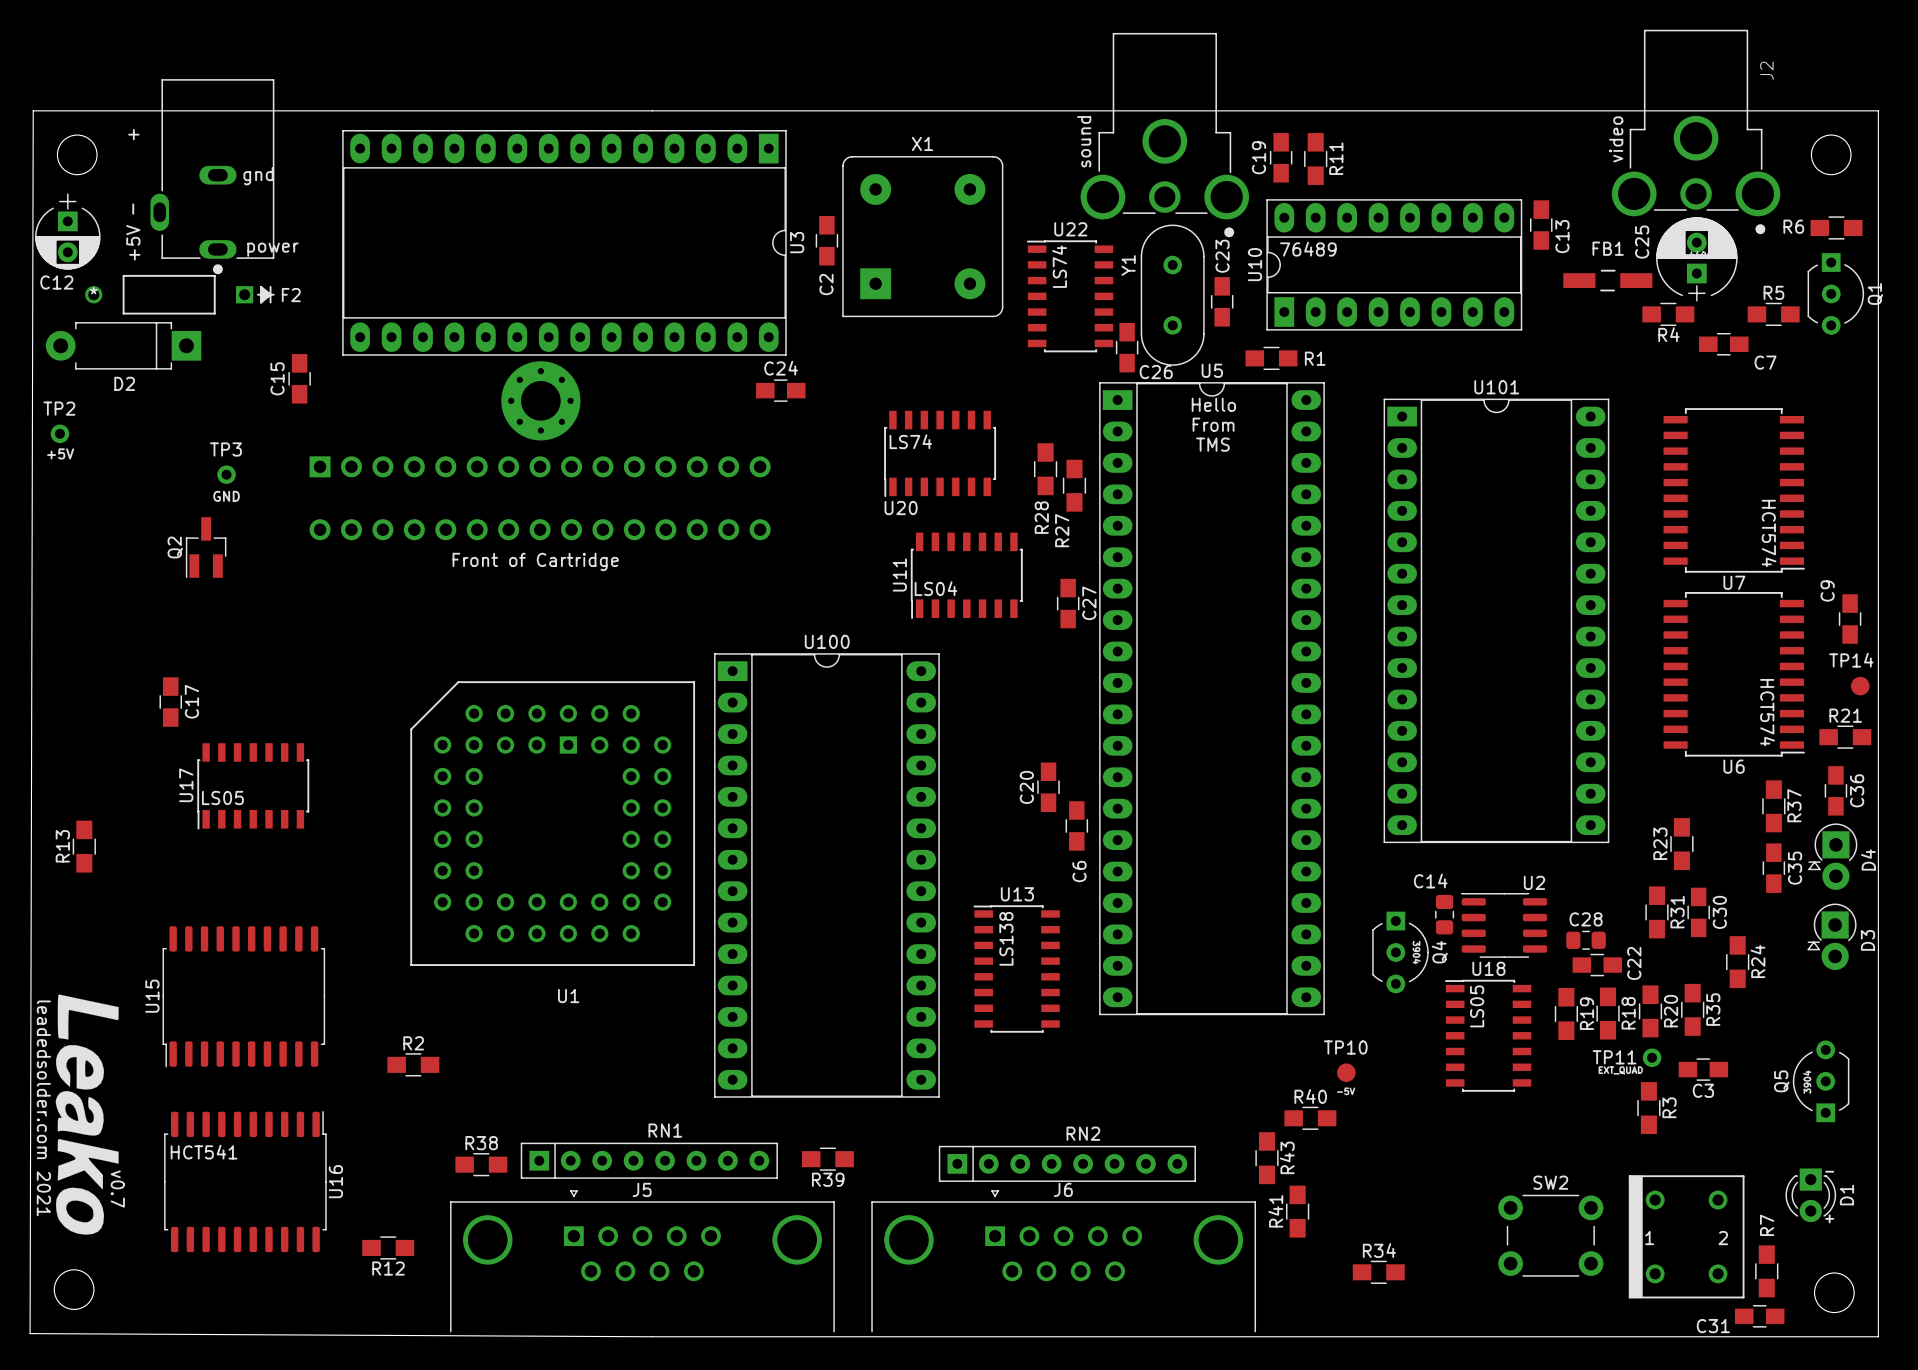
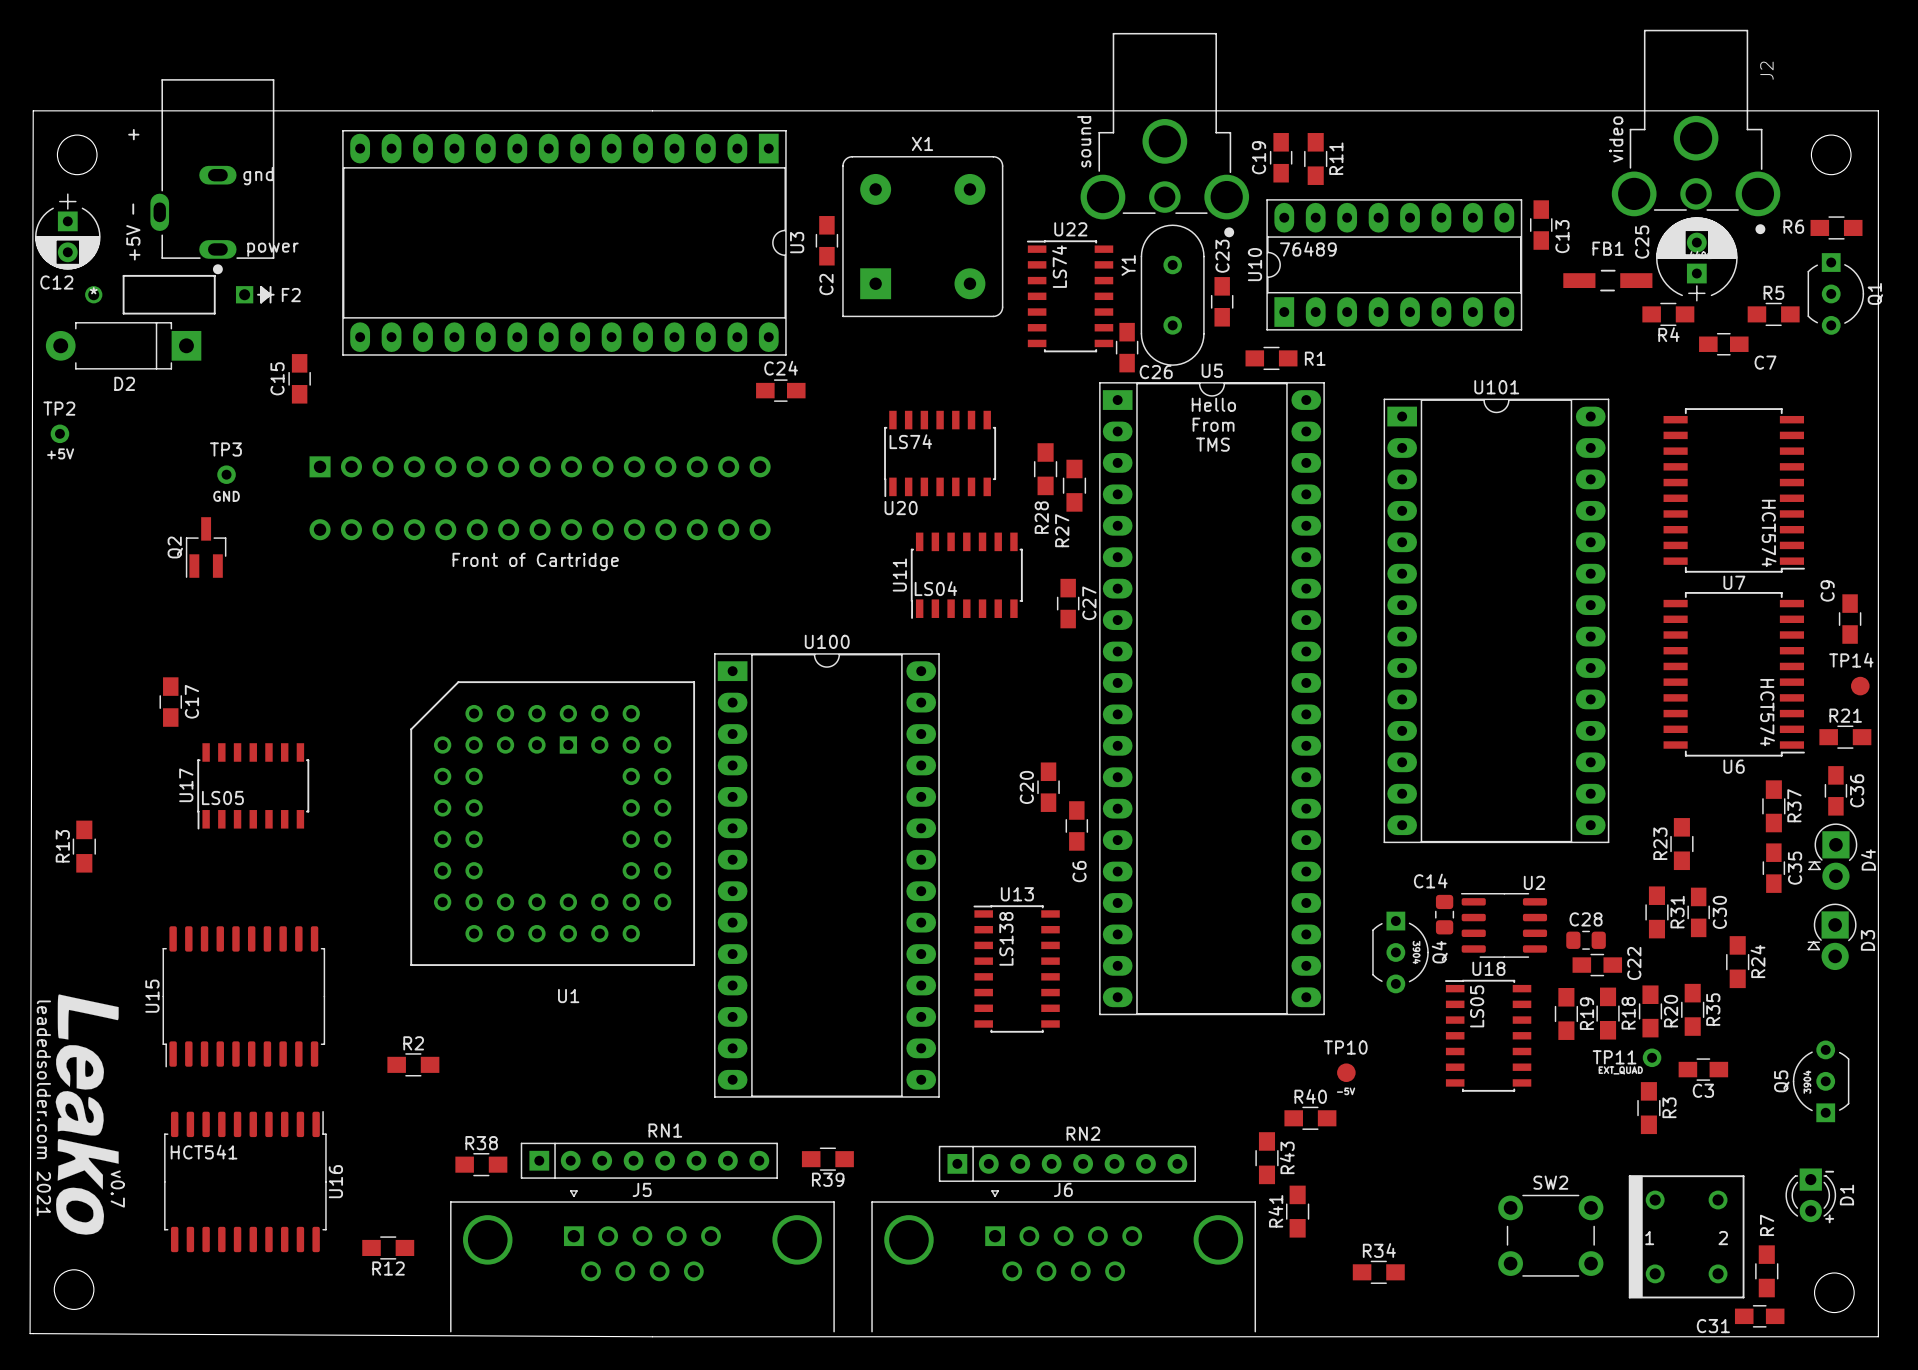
part: (540, 400) -> none

